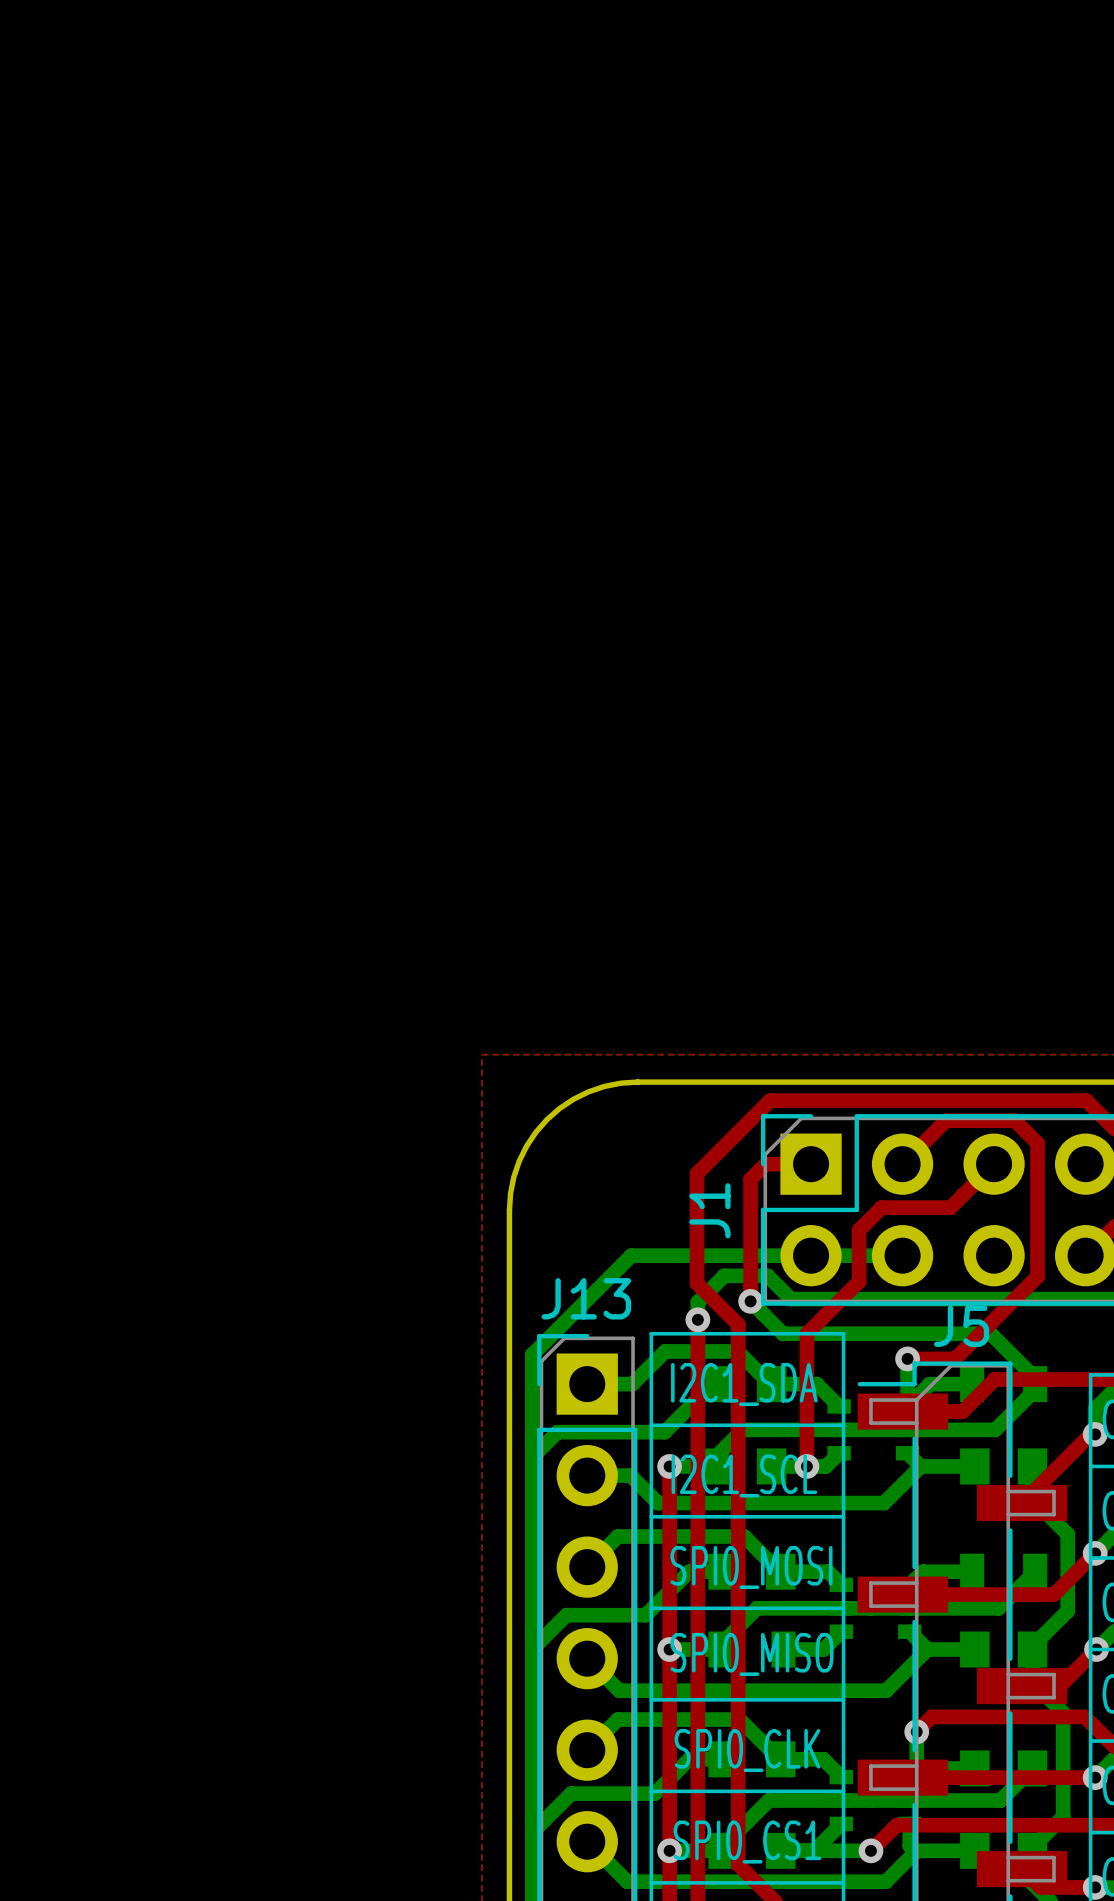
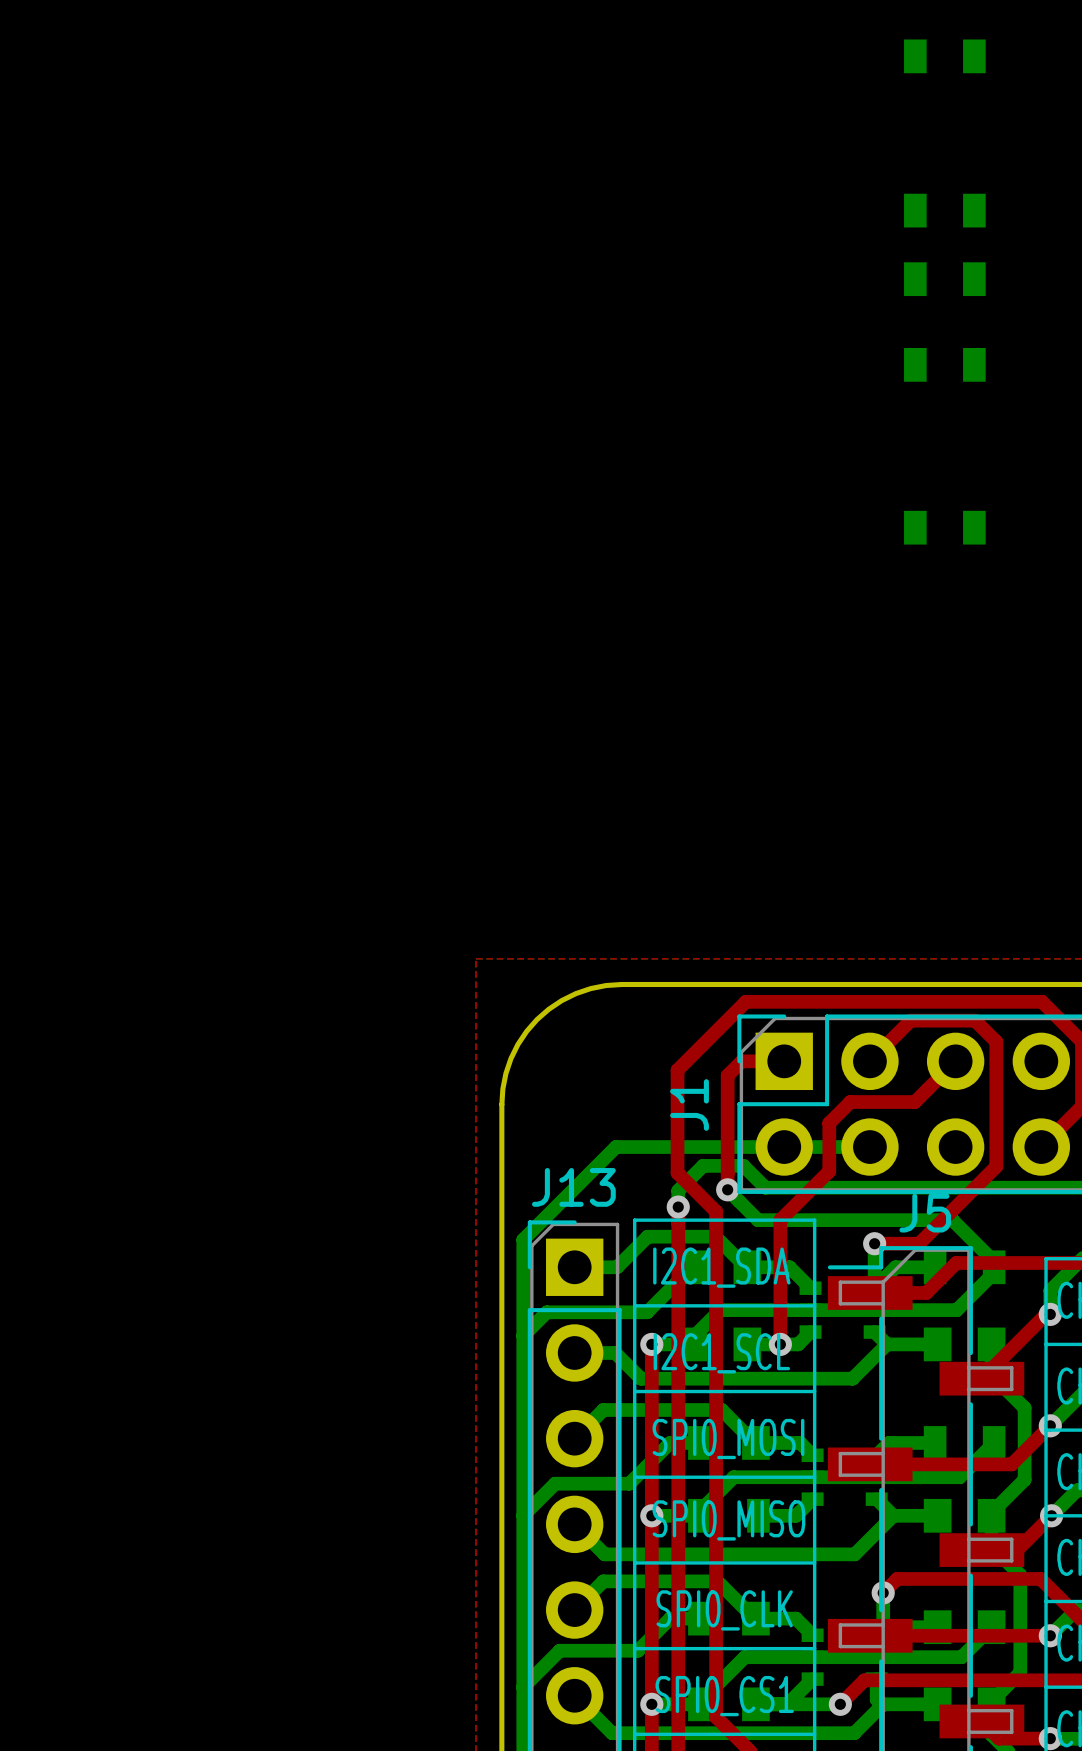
part: none -> (944, 56)
part: none -> (944, 210)
part: none -> (944, 279)
part: none -> (944, 364)
part: none -> (944, 527)

